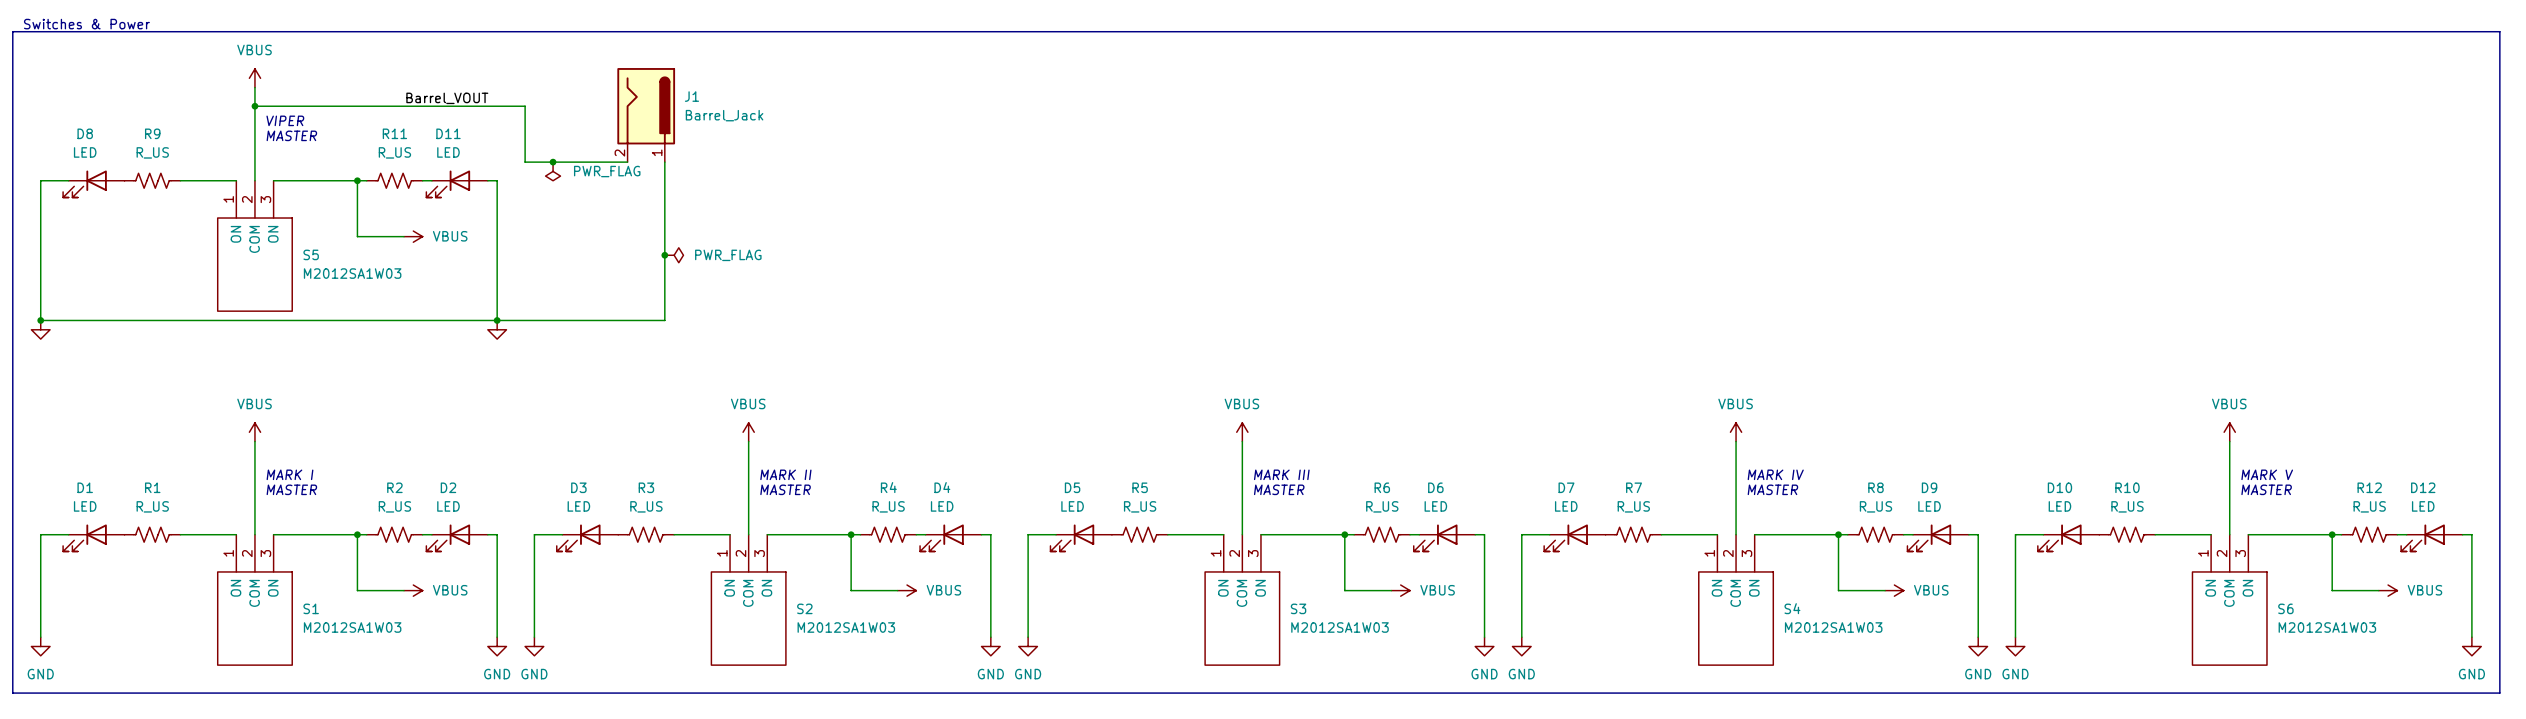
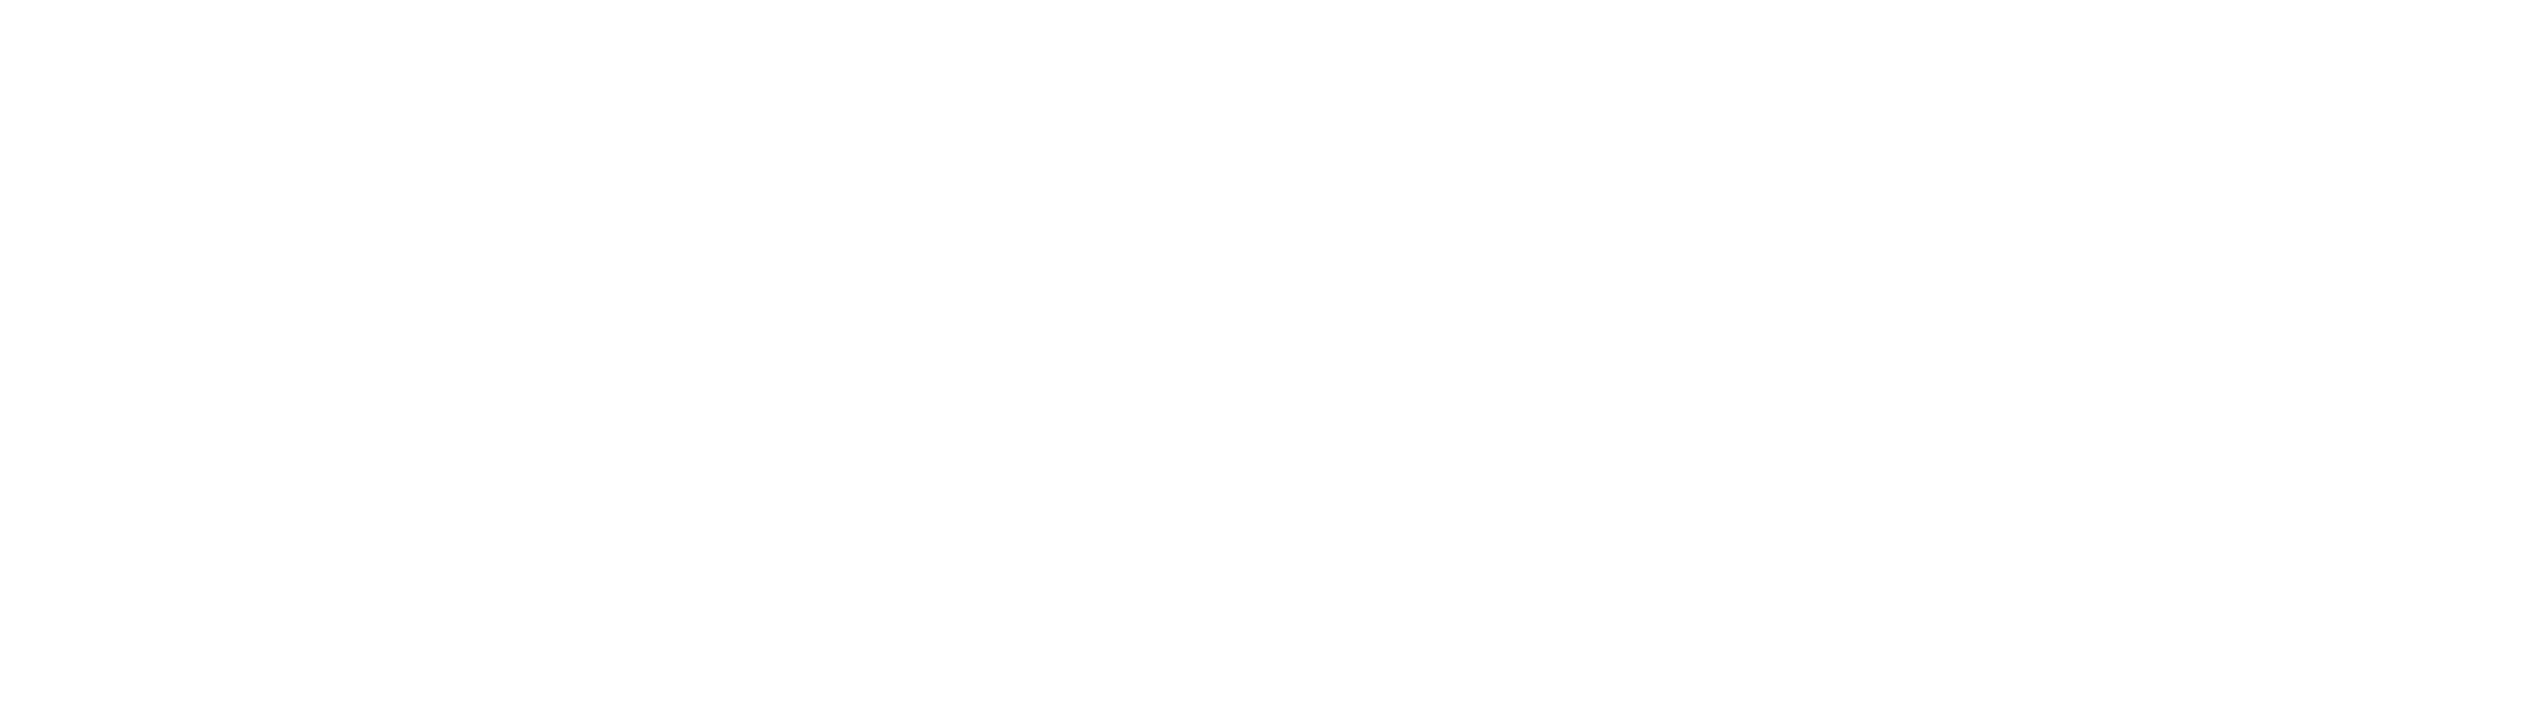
text: Switches & Power (86, 24) -> none
line: (12, 31) (2499, 31) (2499, 693) (12, 693) (12, 31) -> none
power symbol: VBUS (254, 78) -> none
wire: (254, 87) (254, 180) -> none
label: Barrel_VOUT (447, 98) -> none
wire: (254, 106) (525, 106) (525, 162) (627, 162) -> none
junction: (254, 106) -> none
J1: Barrel_Jack (646, 115) -> none
text: VIPER (285, 120) -> none
text: MASTER (291, 135) -> none
junction: (553, 162) -> none
wire: (664, 162) (664, 320) (40, 320) (40, 180) (68, 180) -> none
power symbol: PWR_FLAG (553, 171) -> none
R9: R_US (152, 180) -> none
wire: (180, 180) (236, 180) -> none
wire: (273, 180) (366, 180) -> none
wire: (357, 180) (357, 236) (404, 236) -> none
junction: (357, 180) -> none
R11: R_US (394, 180) -> none
wire: (422, 180) (431, 180) -> none
wire: (487, 180) (497, 180) (497, 320) -> none
D8: LED (93, 184) -> none
D11: LED (457, 184) -> none
power symbol: VBUS (413, 236) -> none
S5: M2012SA1W03 (254, 246) -> none
junction: (664, 255) -> none
power symbol: PWR_FLAG (674, 255) -> none
junction: (40, 320) -> none
junction: (497, 320) -> none
power symbol: (40, 329) -> none
power symbol: (497, 329) -> none
power symbol: VBUS (254, 432) -> none
power symbol: VBUS (748, 432) -> none
power symbol: VBUS (1242, 432) -> none
power symbol: VBUS (1736, 432) -> none
power symbol: VBUS (2229, 432) -> none
wire: (254, 441) (254, 534) -> none
wire: (748, 441) (748, 534) -> none
wire: (1242, 441) (1242, 534) -> none
wire: (1736, 441) (1736, 534) -> none
wire: (2229, 441) (2229, 534) -> none
text: MARK I (290, 474) -> none
text: MARK II (785, 474) -> none
text: MARK III (1281, 474) -> none
text: MARK IV (1775, 474) -> none
text: MARK V (2267, 474) -> none
text: MASTER (291, 489) -> none
text: MASTER (785, 489) -> none
text: MASTER (1279, 489) -> none
text: MASTER (1772, 489) -> none
text: MASTER (2266, 489) -> none
wire: (68, 534) (40, 534) (40, 637) -> none
R1: R_US (152, 534) -> none
wire: (180, 534) (236, 534) -> none
wire: (273, 534) (366, 534) -> none
wire: (357, 534) (357, 590) (404, 590) -> none
junction: (357, 534) -> none
R2: R_US (394, 534) -> none
wire: (422, 534) (431, 534) -> none
wire: (487, 534) (497, 534) (497, 637) -> none
wire: (562, 534) (534, 534) (534, 637) -> none
R3: R_US (646, 534) -> none
wire: (674, 534) (730, 534) -> none
wire: (767, 534) (860, 534) -> none
wire: (851, 534) (851, 590) (897, 590) -> none
junction: (851, 534) -> none
R4: R_US (888, 534) -> none
wire: (916, 534) (925, 534) -> none
wire: (981, 534) (990, 534) (990, 637) -> none
wire: (1056, 534) (1028, 534) (1028, 637) -> none
R5: R_US (1139, 534) -> none
wire: (1167, 534) (1223, 534) -> none
wire: (1260, 534) (1354, 534) -> none
wire: (1344, 534) (1344, 590) (1391, 590) -> none
junction: (1344, 534) -> none
R6: R_US (1382, 534) -> none
wire: (1410, 534) (1419, 534) -> none
wire: (1475, 534) (1484, 534) (1484, 637) -> none
wire: (1549, 534) (1521, 534) (1521, 637) -> none
R7: R_US (1633, 534) -> none
wire: (1661, 534) (1717, 534) -> none
wire: (1754, 534) (1847, 534) -> none
wire: (1838, 534) (1838, 590) (1885, 590) -> none
junction: (1838, 534) -> none
R8: R_US (1875, 534) -> none
wire: (1903, 534) (1913, 534) -> none
wire: (1968, 534) (1978, 534) (1978, 637) -> none
wire: (2043, 534) (2015, 534) (2015, 637) -> none
R10: R_US (2127, 534) -> none
wire: (2155, 534) (2211, 534) -> none
wire: (2248, 534) (2341, 534) -> none
wire: (2332, 534) (2332, 590) (2378, 590) -> none
junction: (2332, 534) -> none
R12: R_US (2369, 534) -> none
wire: (2397, 534) (2406, 534) -> none
wire: (2462, 534) (2471, 534) (2471, 637) -> none
D1: LED (93, 537) -> none
D2: LED (457, 537) -> none
D3: LED (587, 537) -> none
D4: LED (950, 537) -> none
D5: LED (1081, 537) -> none
D6: LED (1444, 537) -> none
D7: LED (1574, 537) -> none
D9: LED (1938, 537) -> none
D10: LED (2068, 537) -> none
D12: LED (2431, 537) -> none
power symbol: VBUS (413, 590) -> none
power symbol: VBUS (907, 590) -> none
power symbol: VBUS (1400, 590) -> none
power symbol: VBUS (1894, 590) -> none
power symbol: VBUS (2388, 590) -> none
S1: M2012SA1W03 (254, 600) -> none
S2: M2012SA1W03 (748, 600) -> none
S3: M2012SA1W03 (1242, 600) -> none
S4: M2012SA1W03 (1736, 600) -> none
S6: M2012SA1W03 (2229, 600) -> none
power symbol: GND (40, 646) -> none
power symbol: GND (497, 646) -> none
power symbol: GND (534, 646) -> none
power symbol: GND (990, 646) -> none
power symbol: GND (1028, 646) -> none
power symbol: GND (1484, 646) -> none
power symbol: GND (1521, 646) -> none
power symbol: GND (1978, 646) -> none
power symbol: GND (2015, 646) -> none
power symbol: GND (2471, 646) -> none

